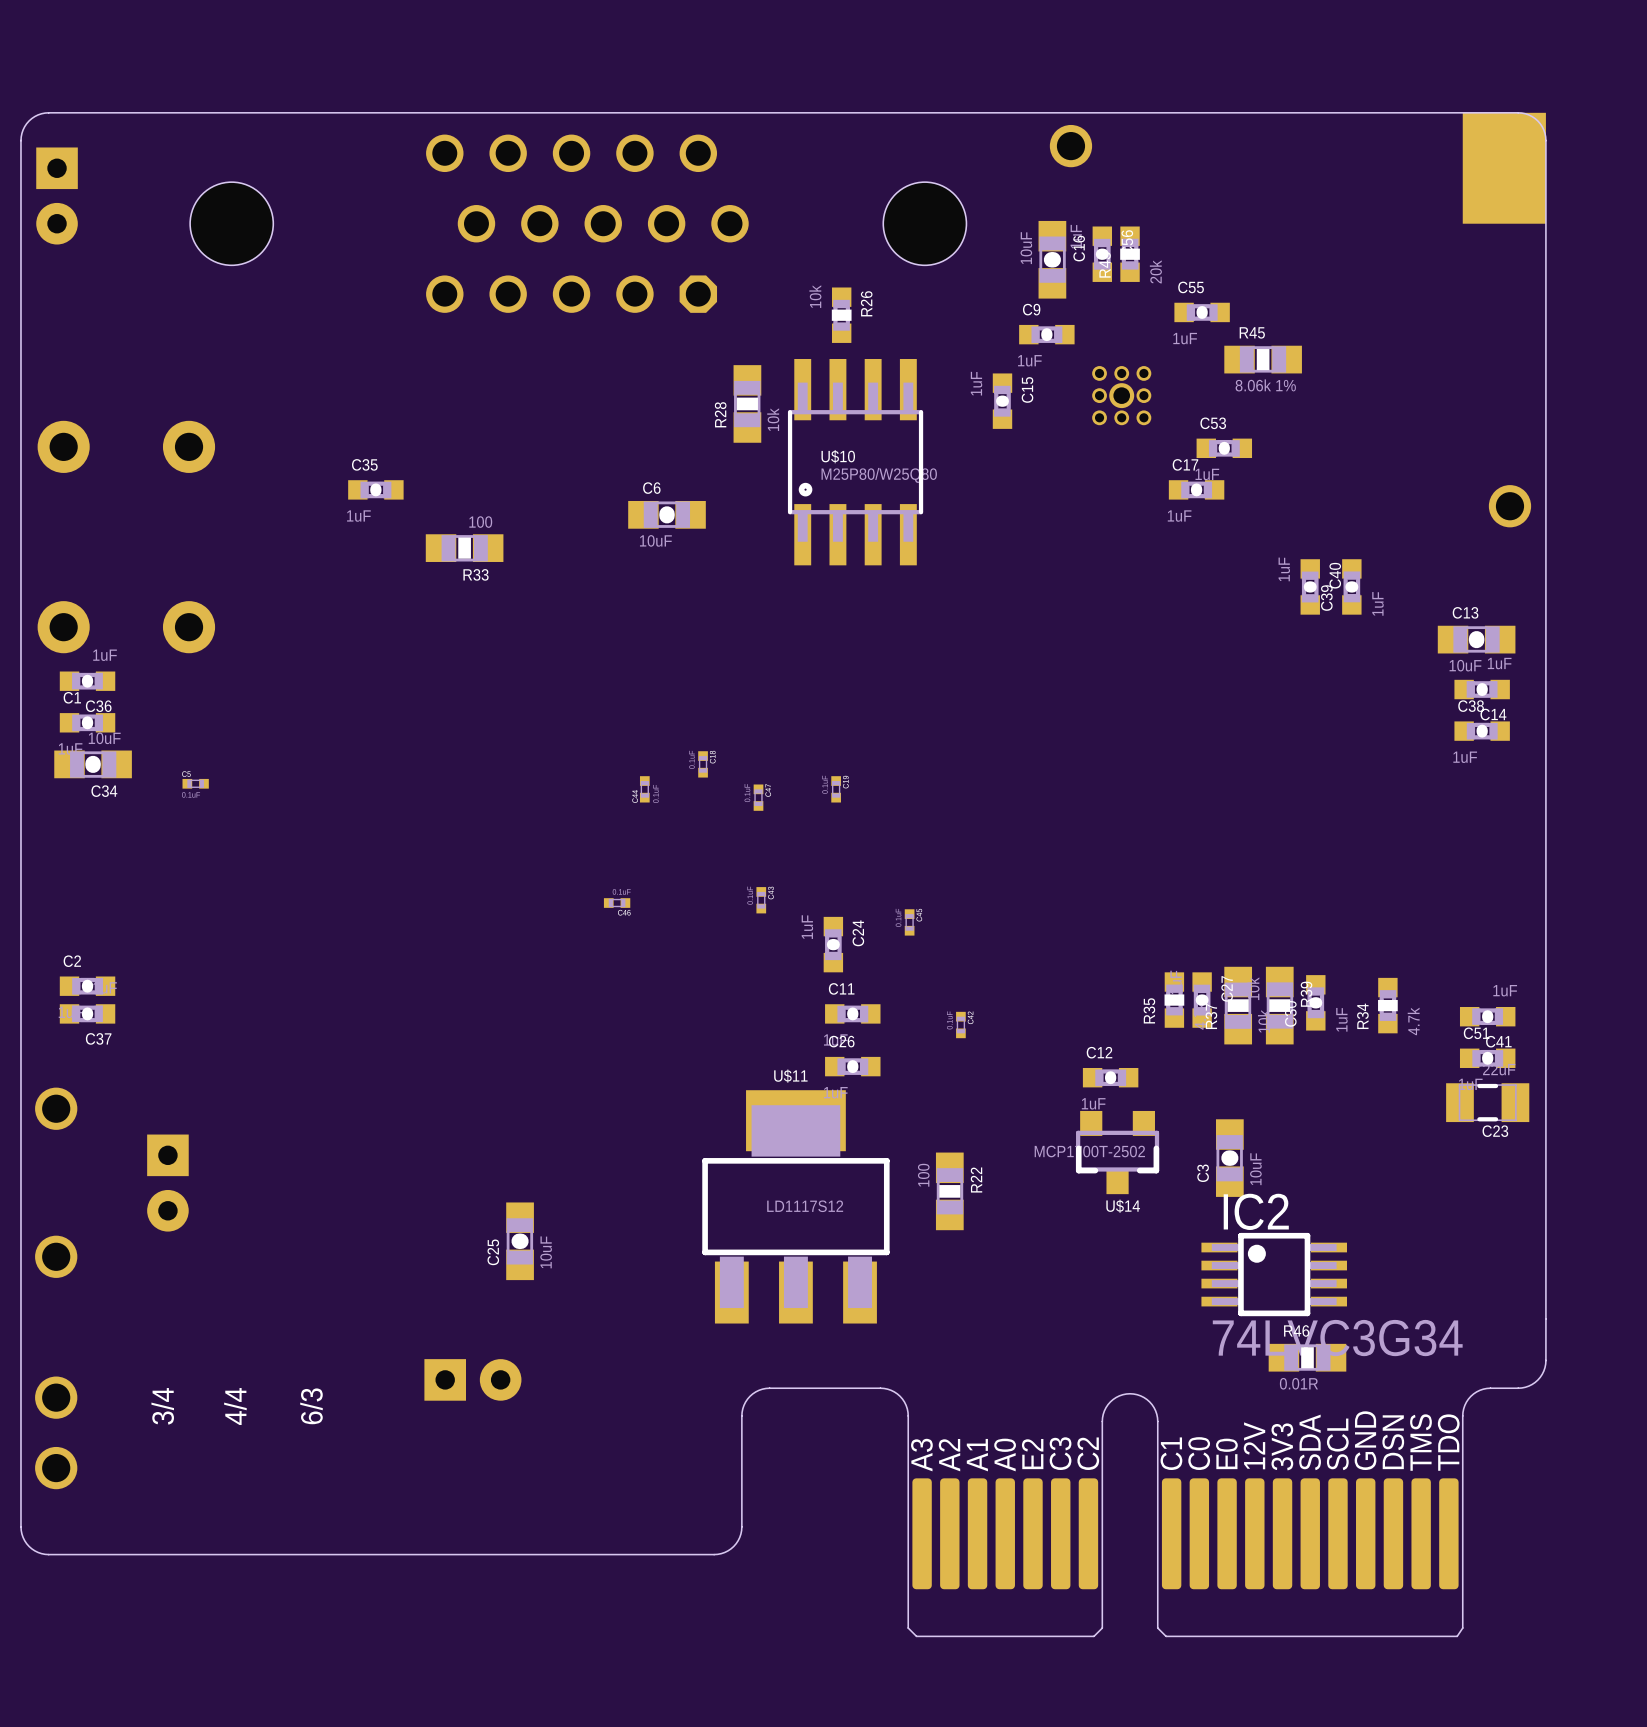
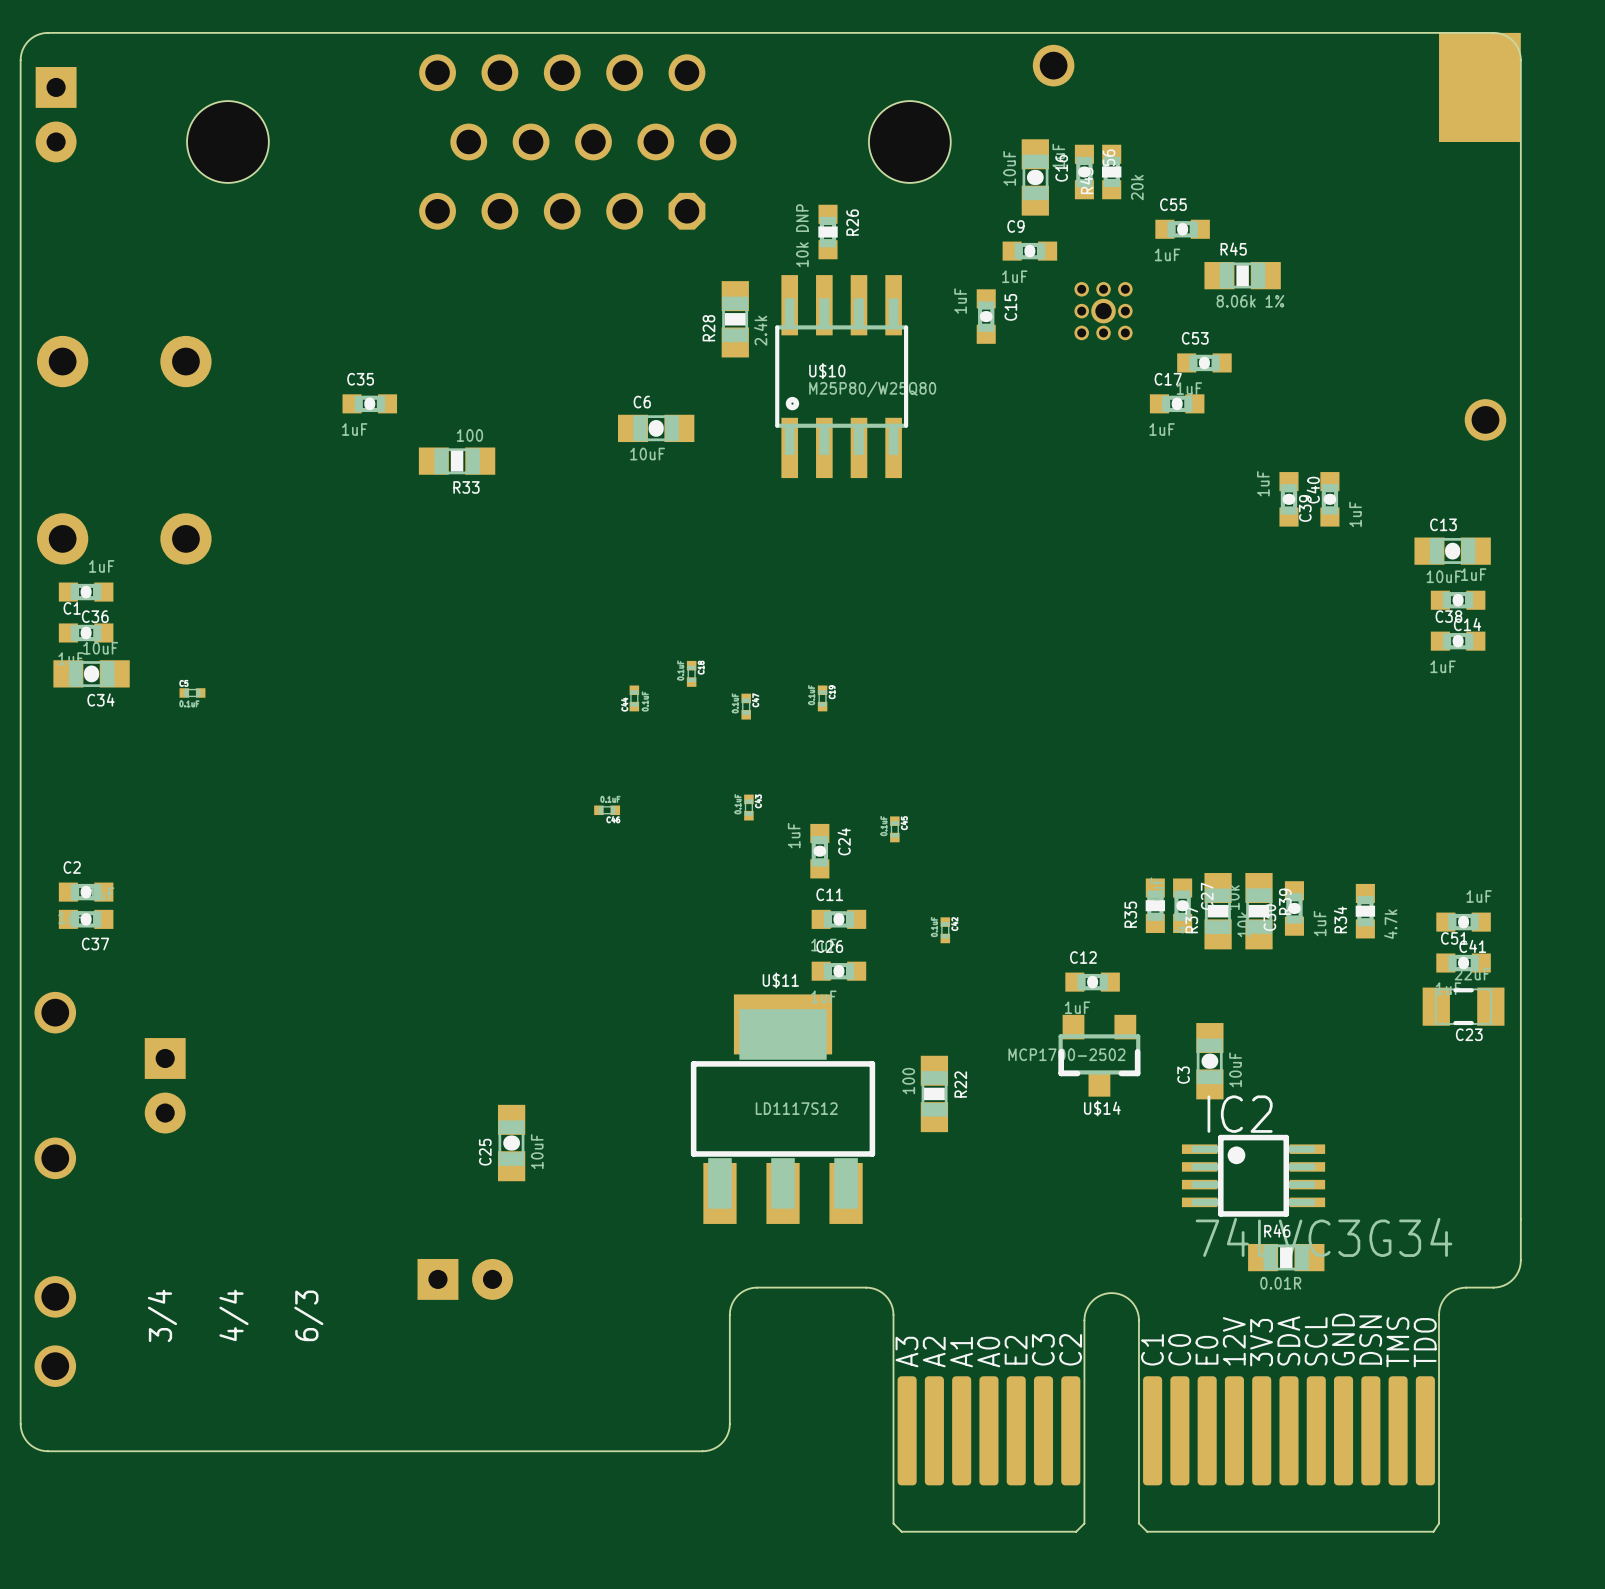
R26 value: 10k (815, 296) -> 10k DNP (802, 235)
R28 value: 10k (773, 419) -> 2.4k (760, 330)
U$14 value: MCP1700T-2502 (1089, 1151) -> MCP1700-2502 (1066, 1054)

